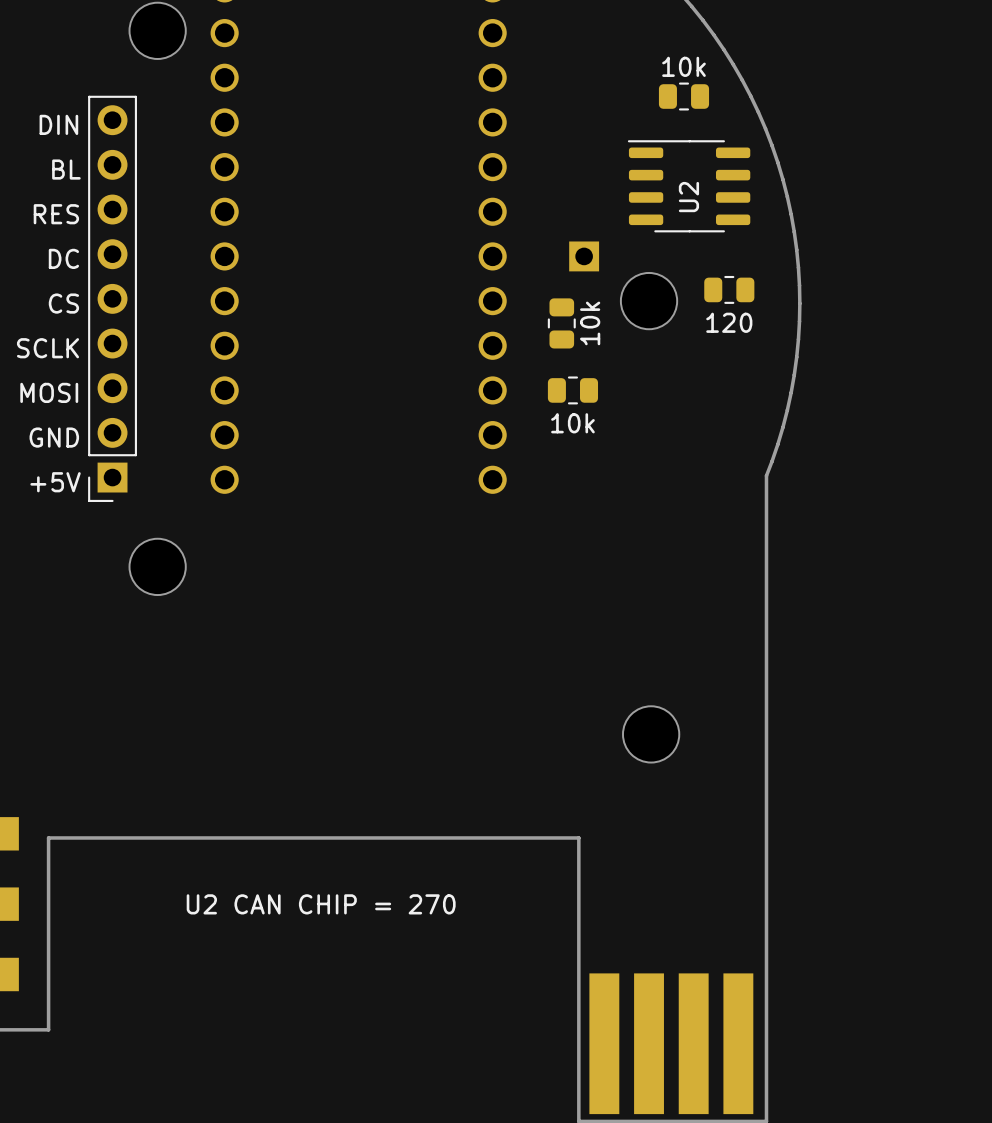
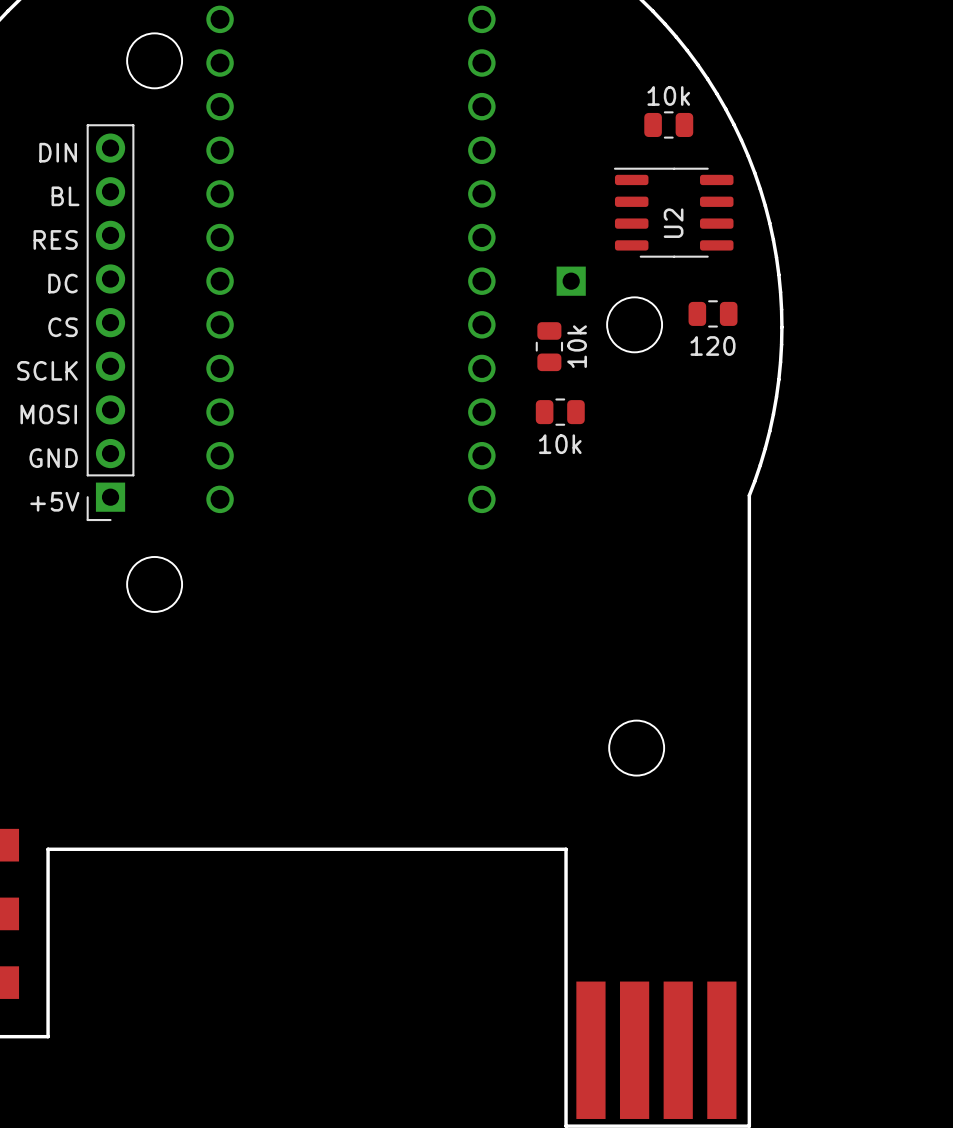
text: U2 CAN CHIP = 270 (321, 904) -> none

